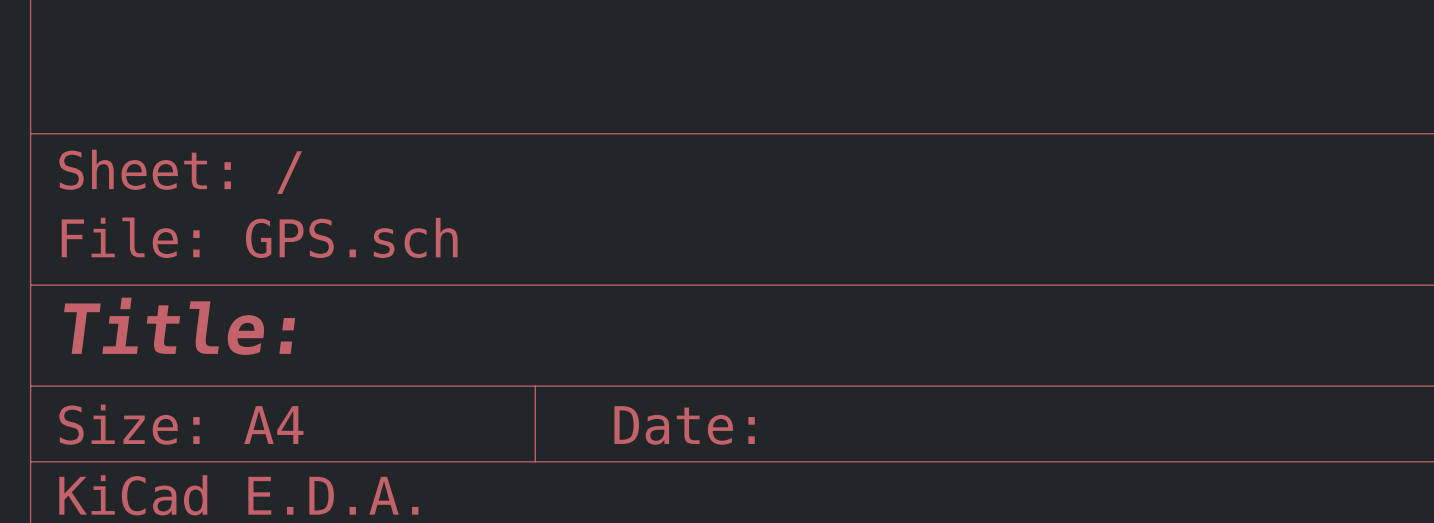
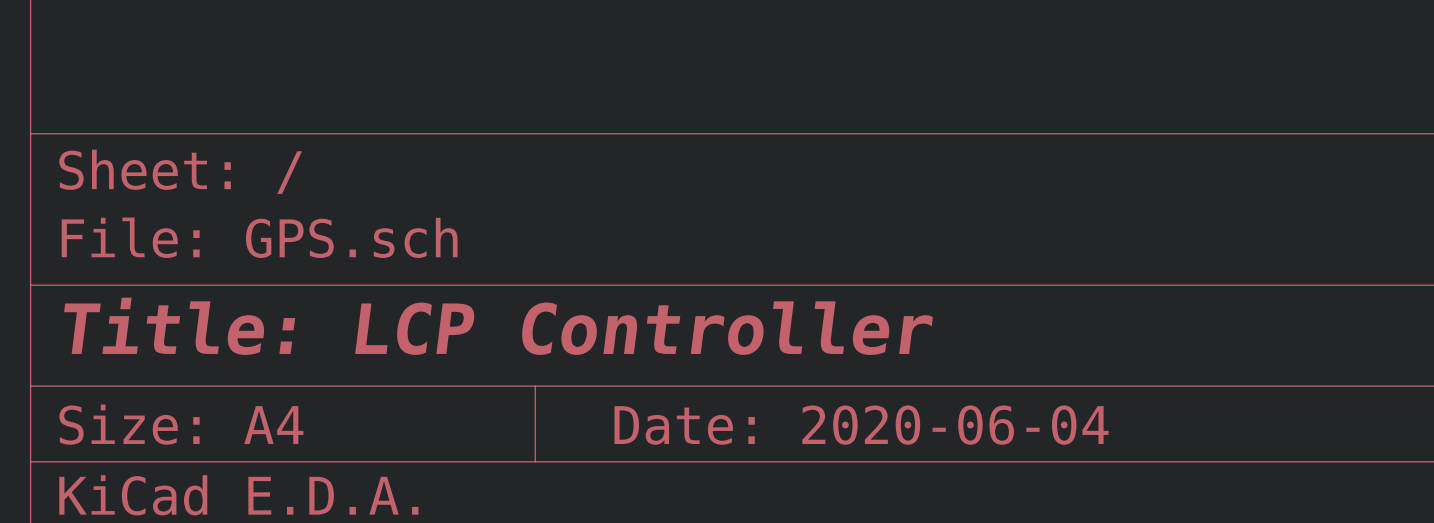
title block: Title: (179, 326) -> Title: LCP Controller (498, 326)
title block: Date: (684, 425) -> Date: 2020-06-04 (861, 425)

